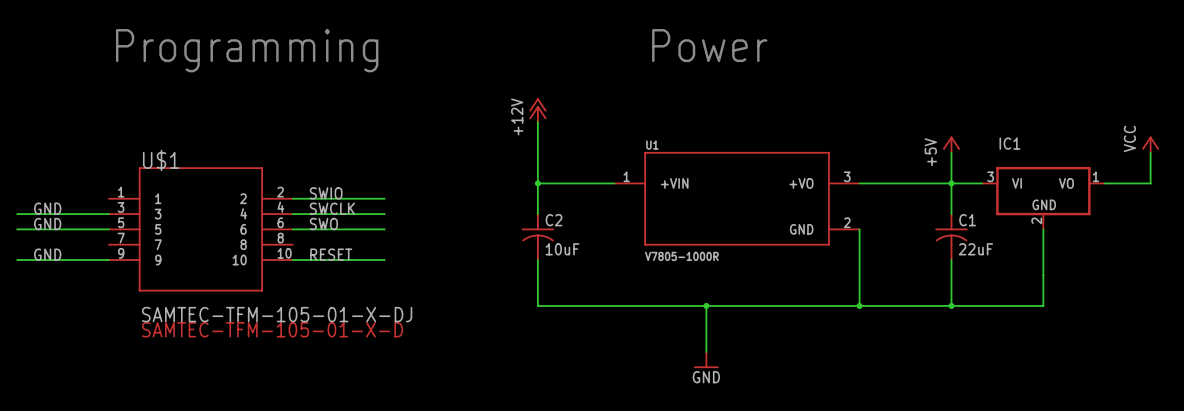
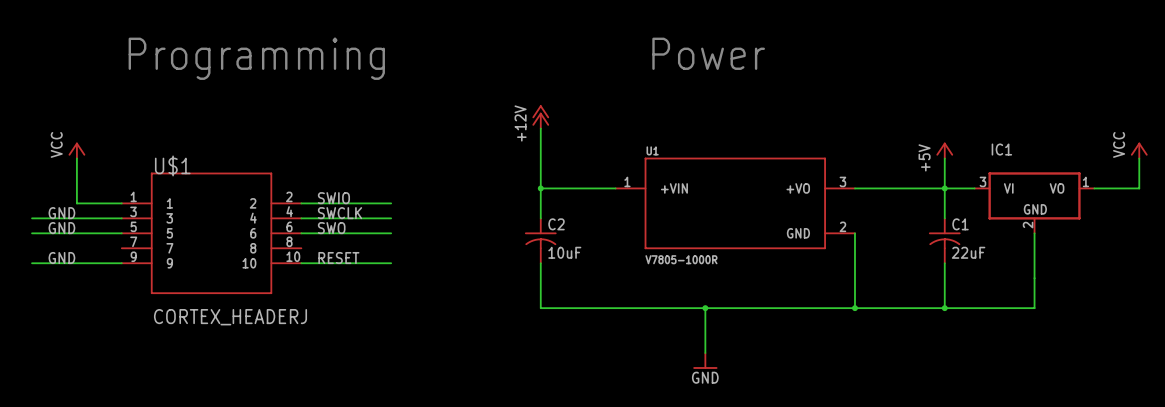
power symbol: none -> VCC (76, 150)
wire: none -> (76, 158) (76, 203) (121, 203)
U$1 value: SAMTEC-TFM-105-01-X-DJ (277, 314) -> CORTEX_HEADERJ (230, 317)
U$1 text: SAMTEC-TFM-105-01-X-D (272, 329) -> none

